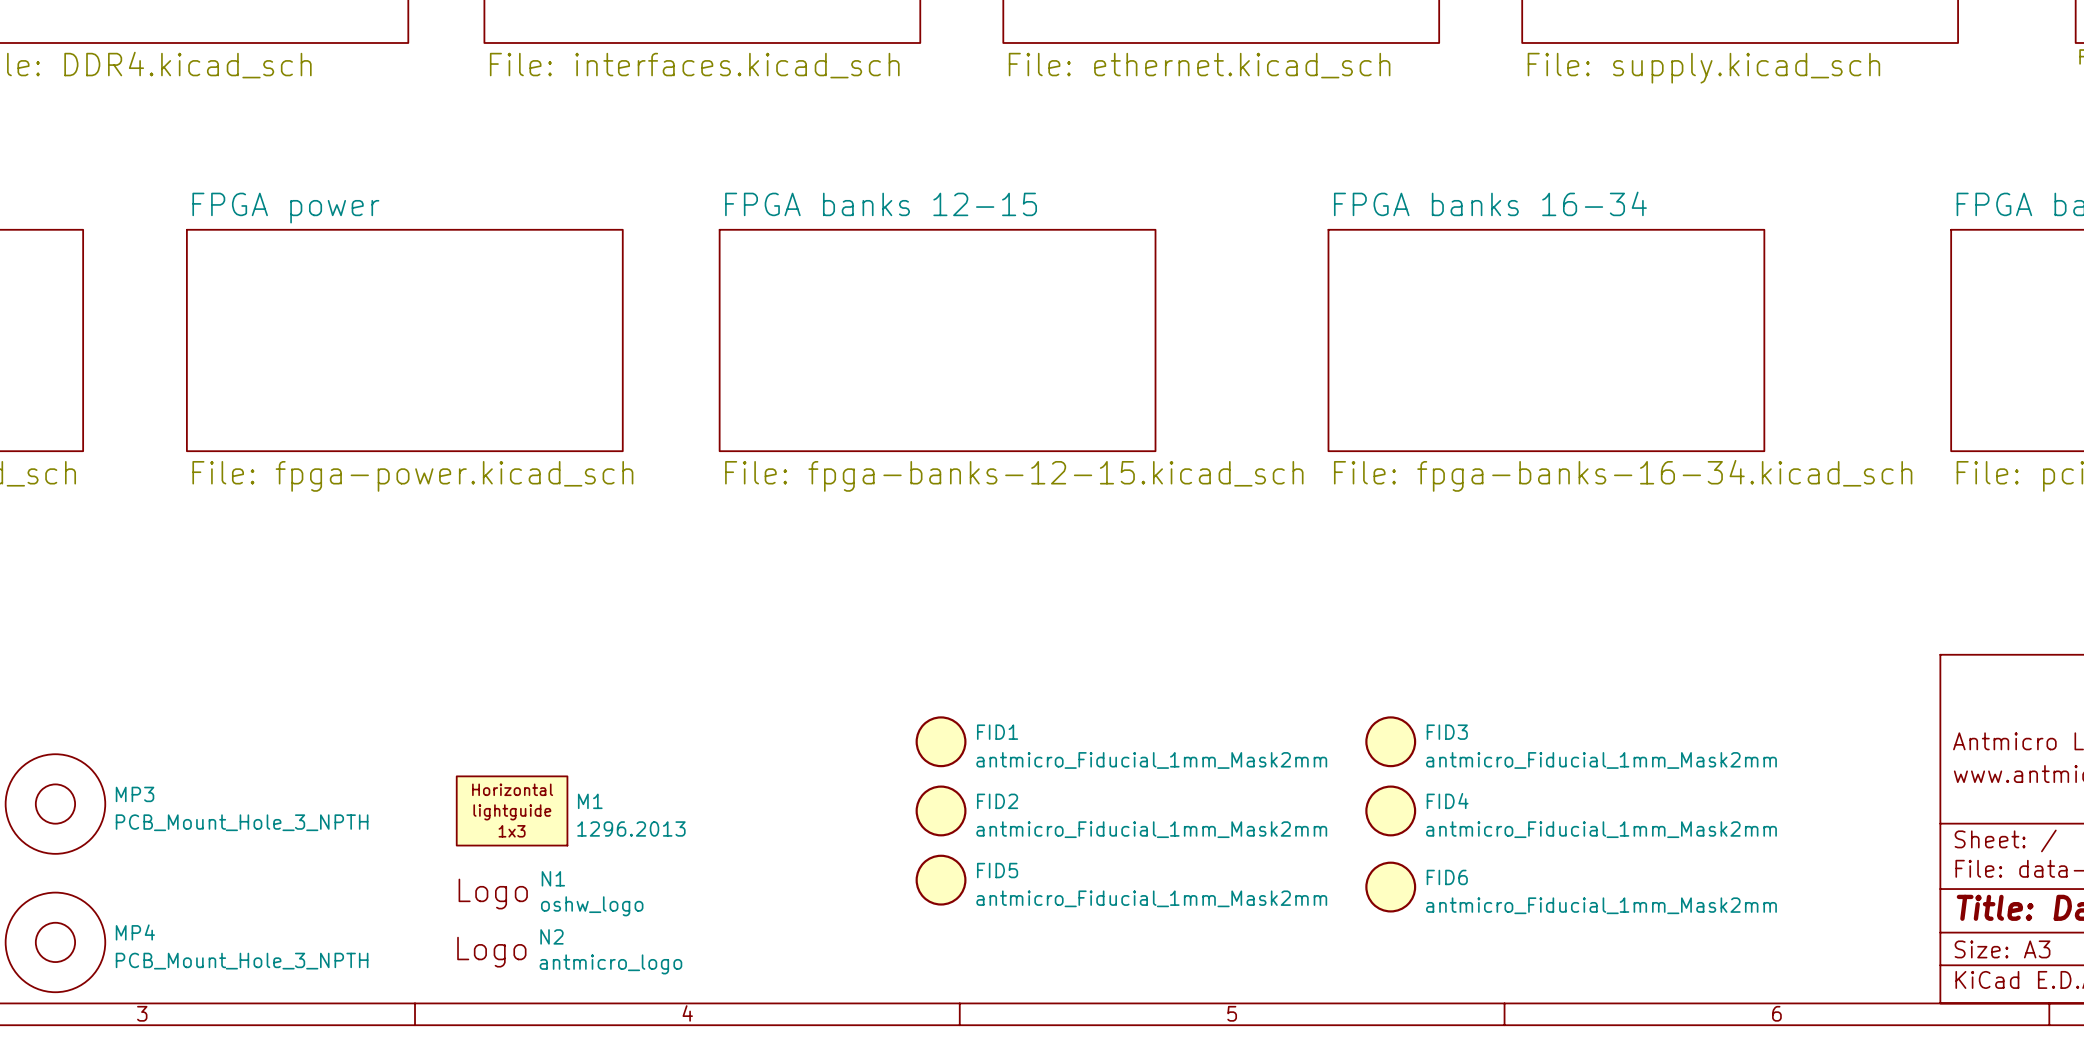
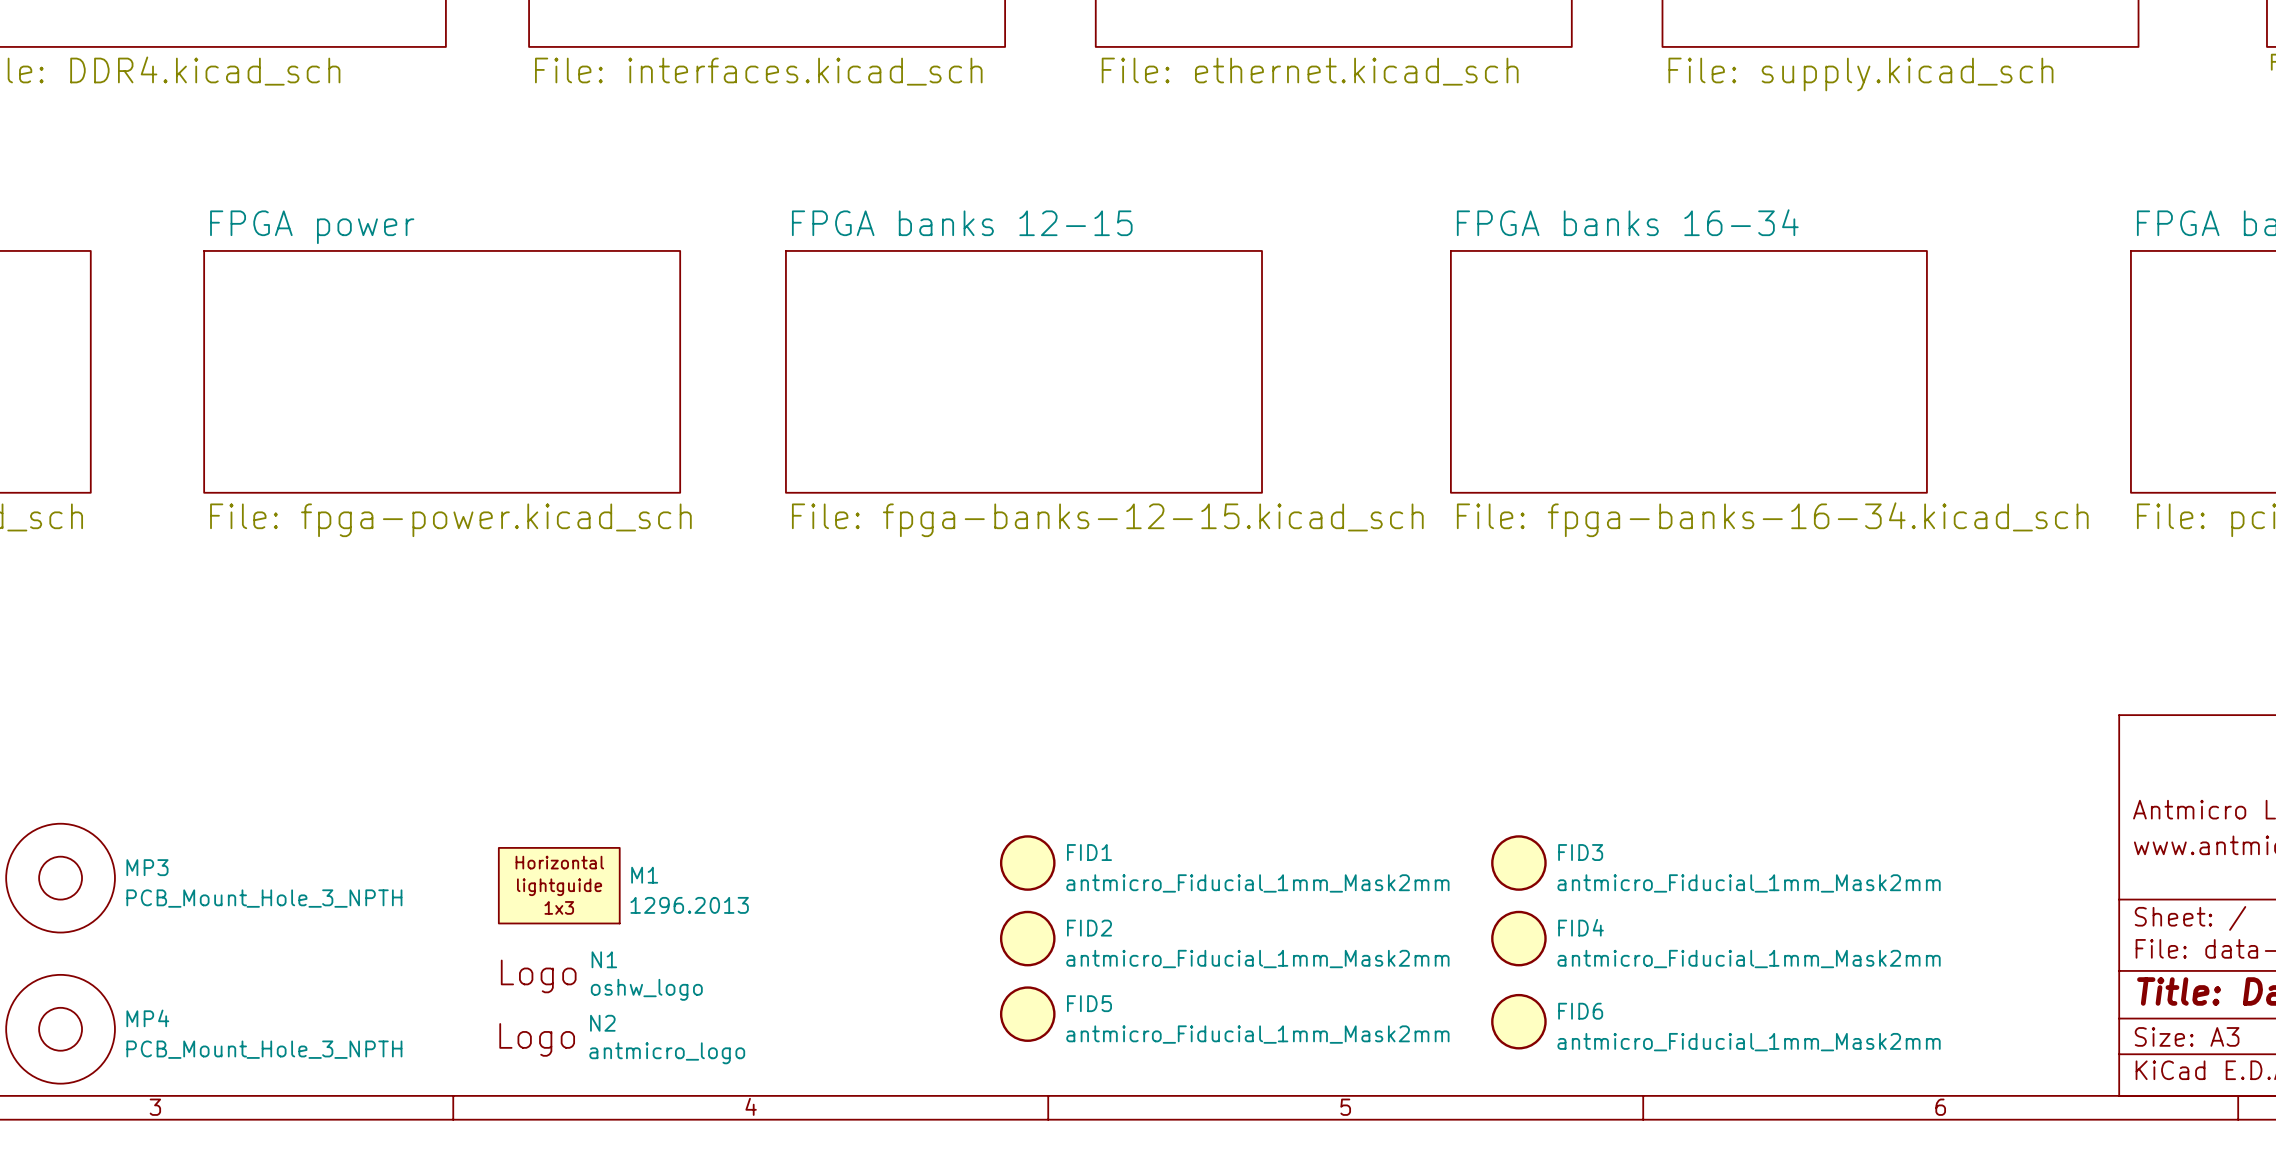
FID1 position: (941, 741) -> (1027, 863)
FID3 position: (1390, 741) -> (1518, 863)
FID2 position: (941, 810) -> (1027, 938)
FID4 position: (1390, 810) -> (1518, 938)
FID5 position: (941, 880) -> (1027, 1014)
FID6 position: (1390, 887) -> (1518, 1021)

